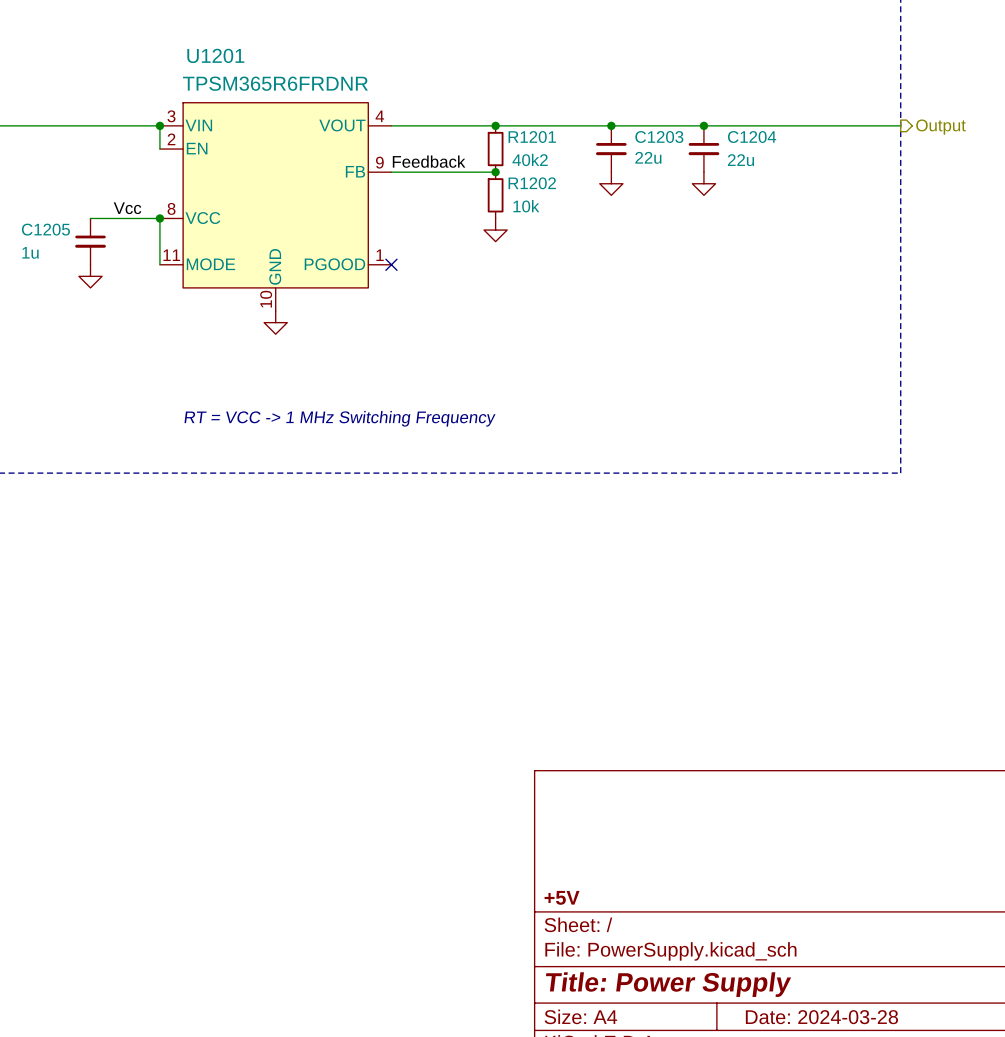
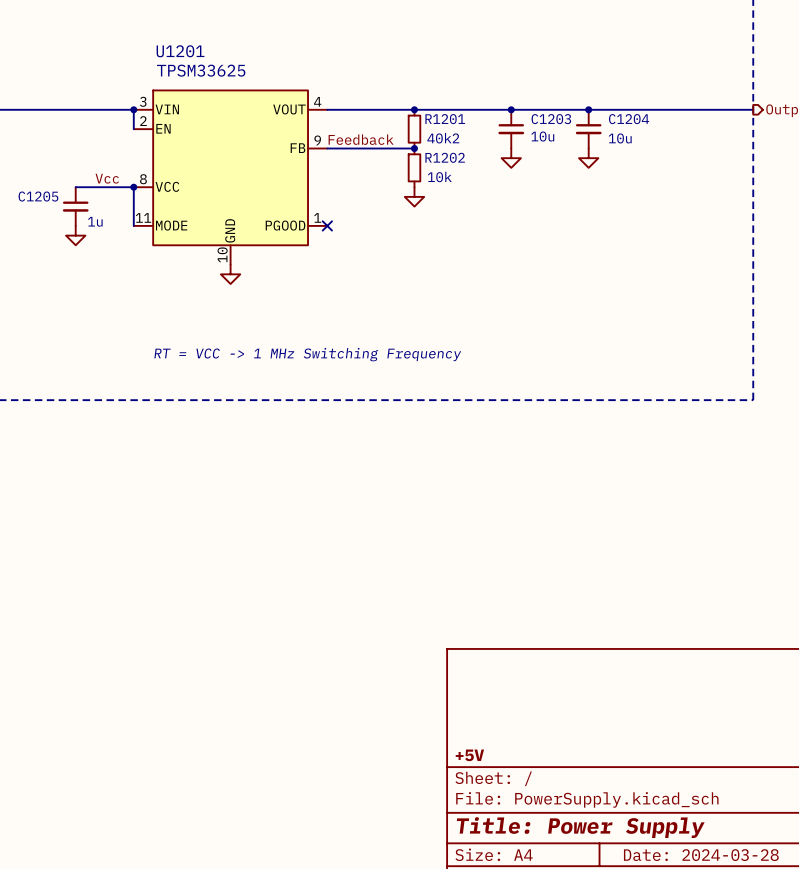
U1201 value: TPSM365R6FRDNR (275, 83) -> TPSM33625 (201, 70)
C1203 value: 22u (648, 157) -> 10u (542, 136)
C1204 value: 22u (741, 160) -> 10u (620, 138)
C1205 value position: 1u (30, 252) -> 1u (95, 221)

